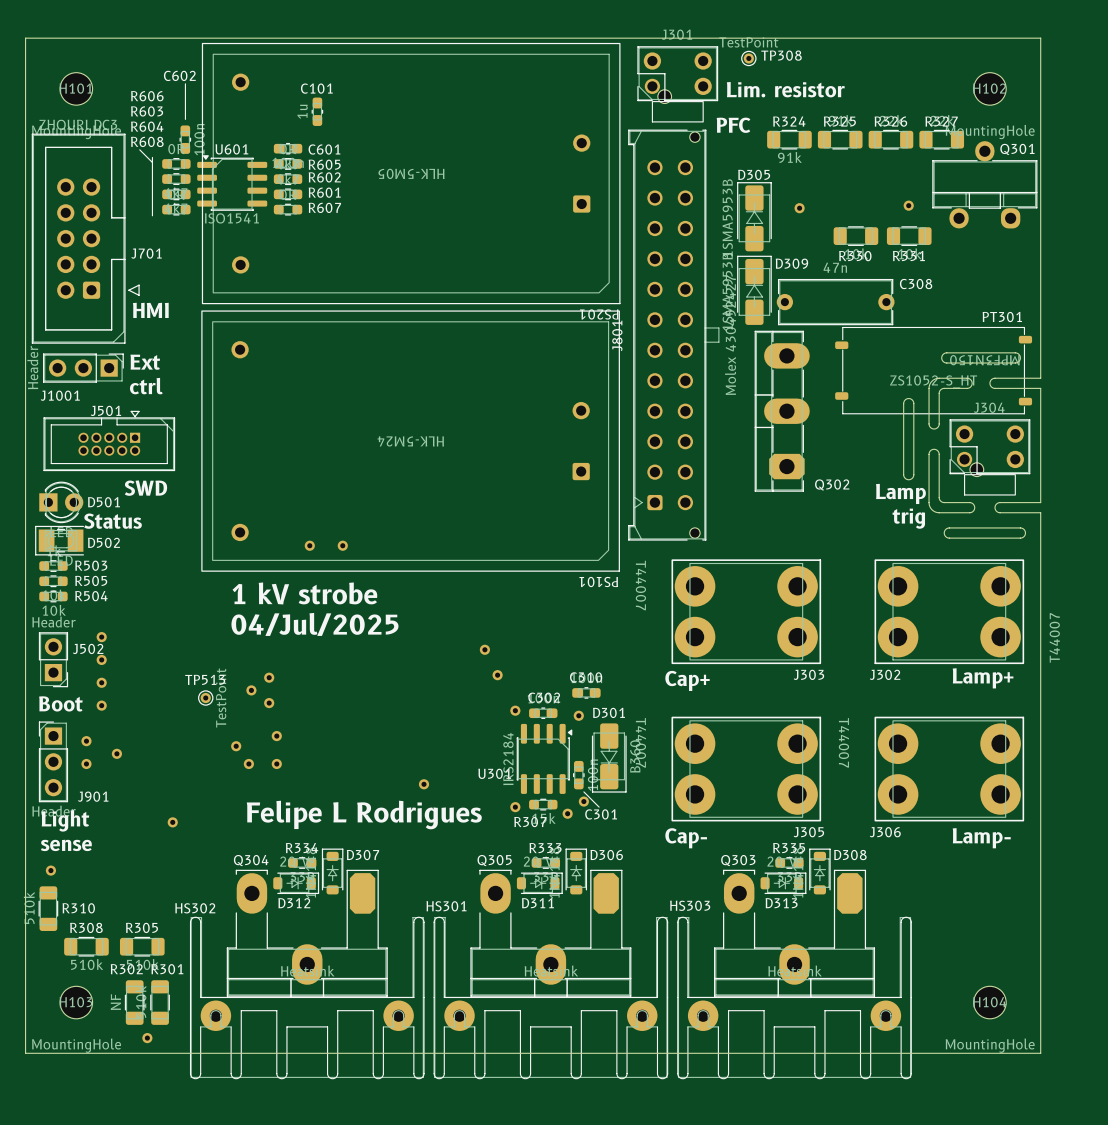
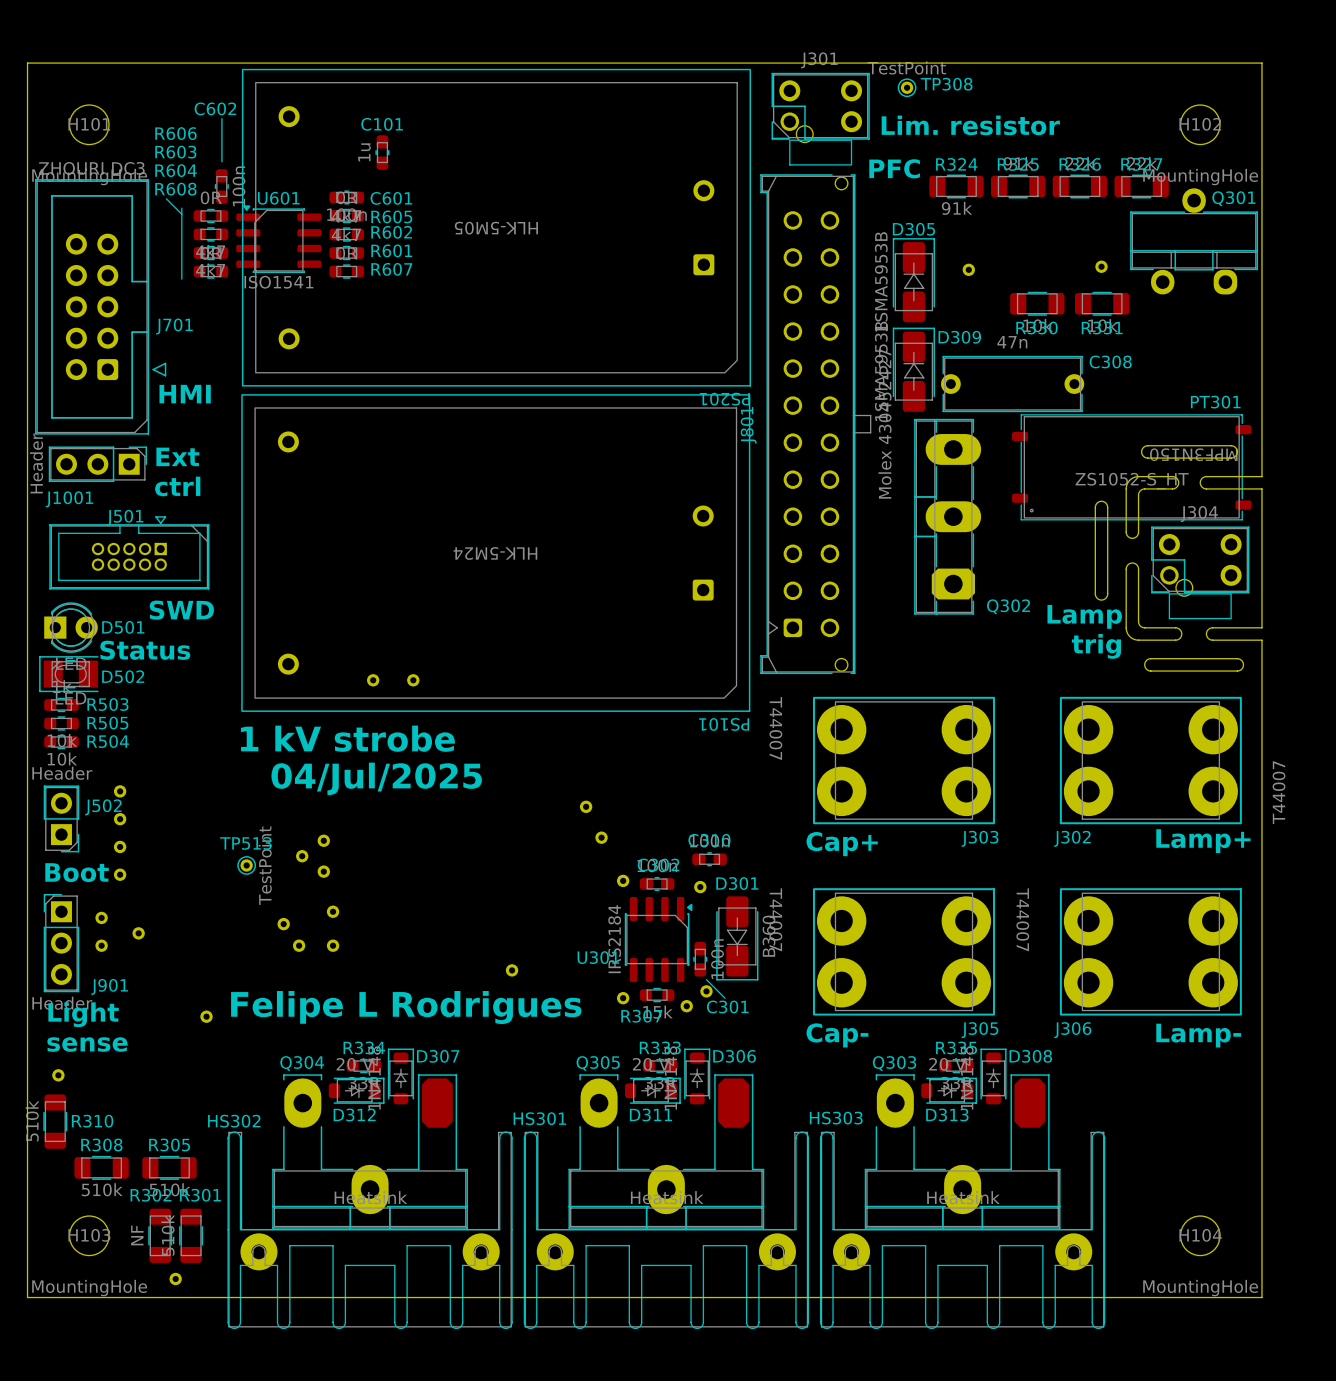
PT301 footprint: [835, 326, 1033, 415] -> [1012, 414, 1252, 521]

